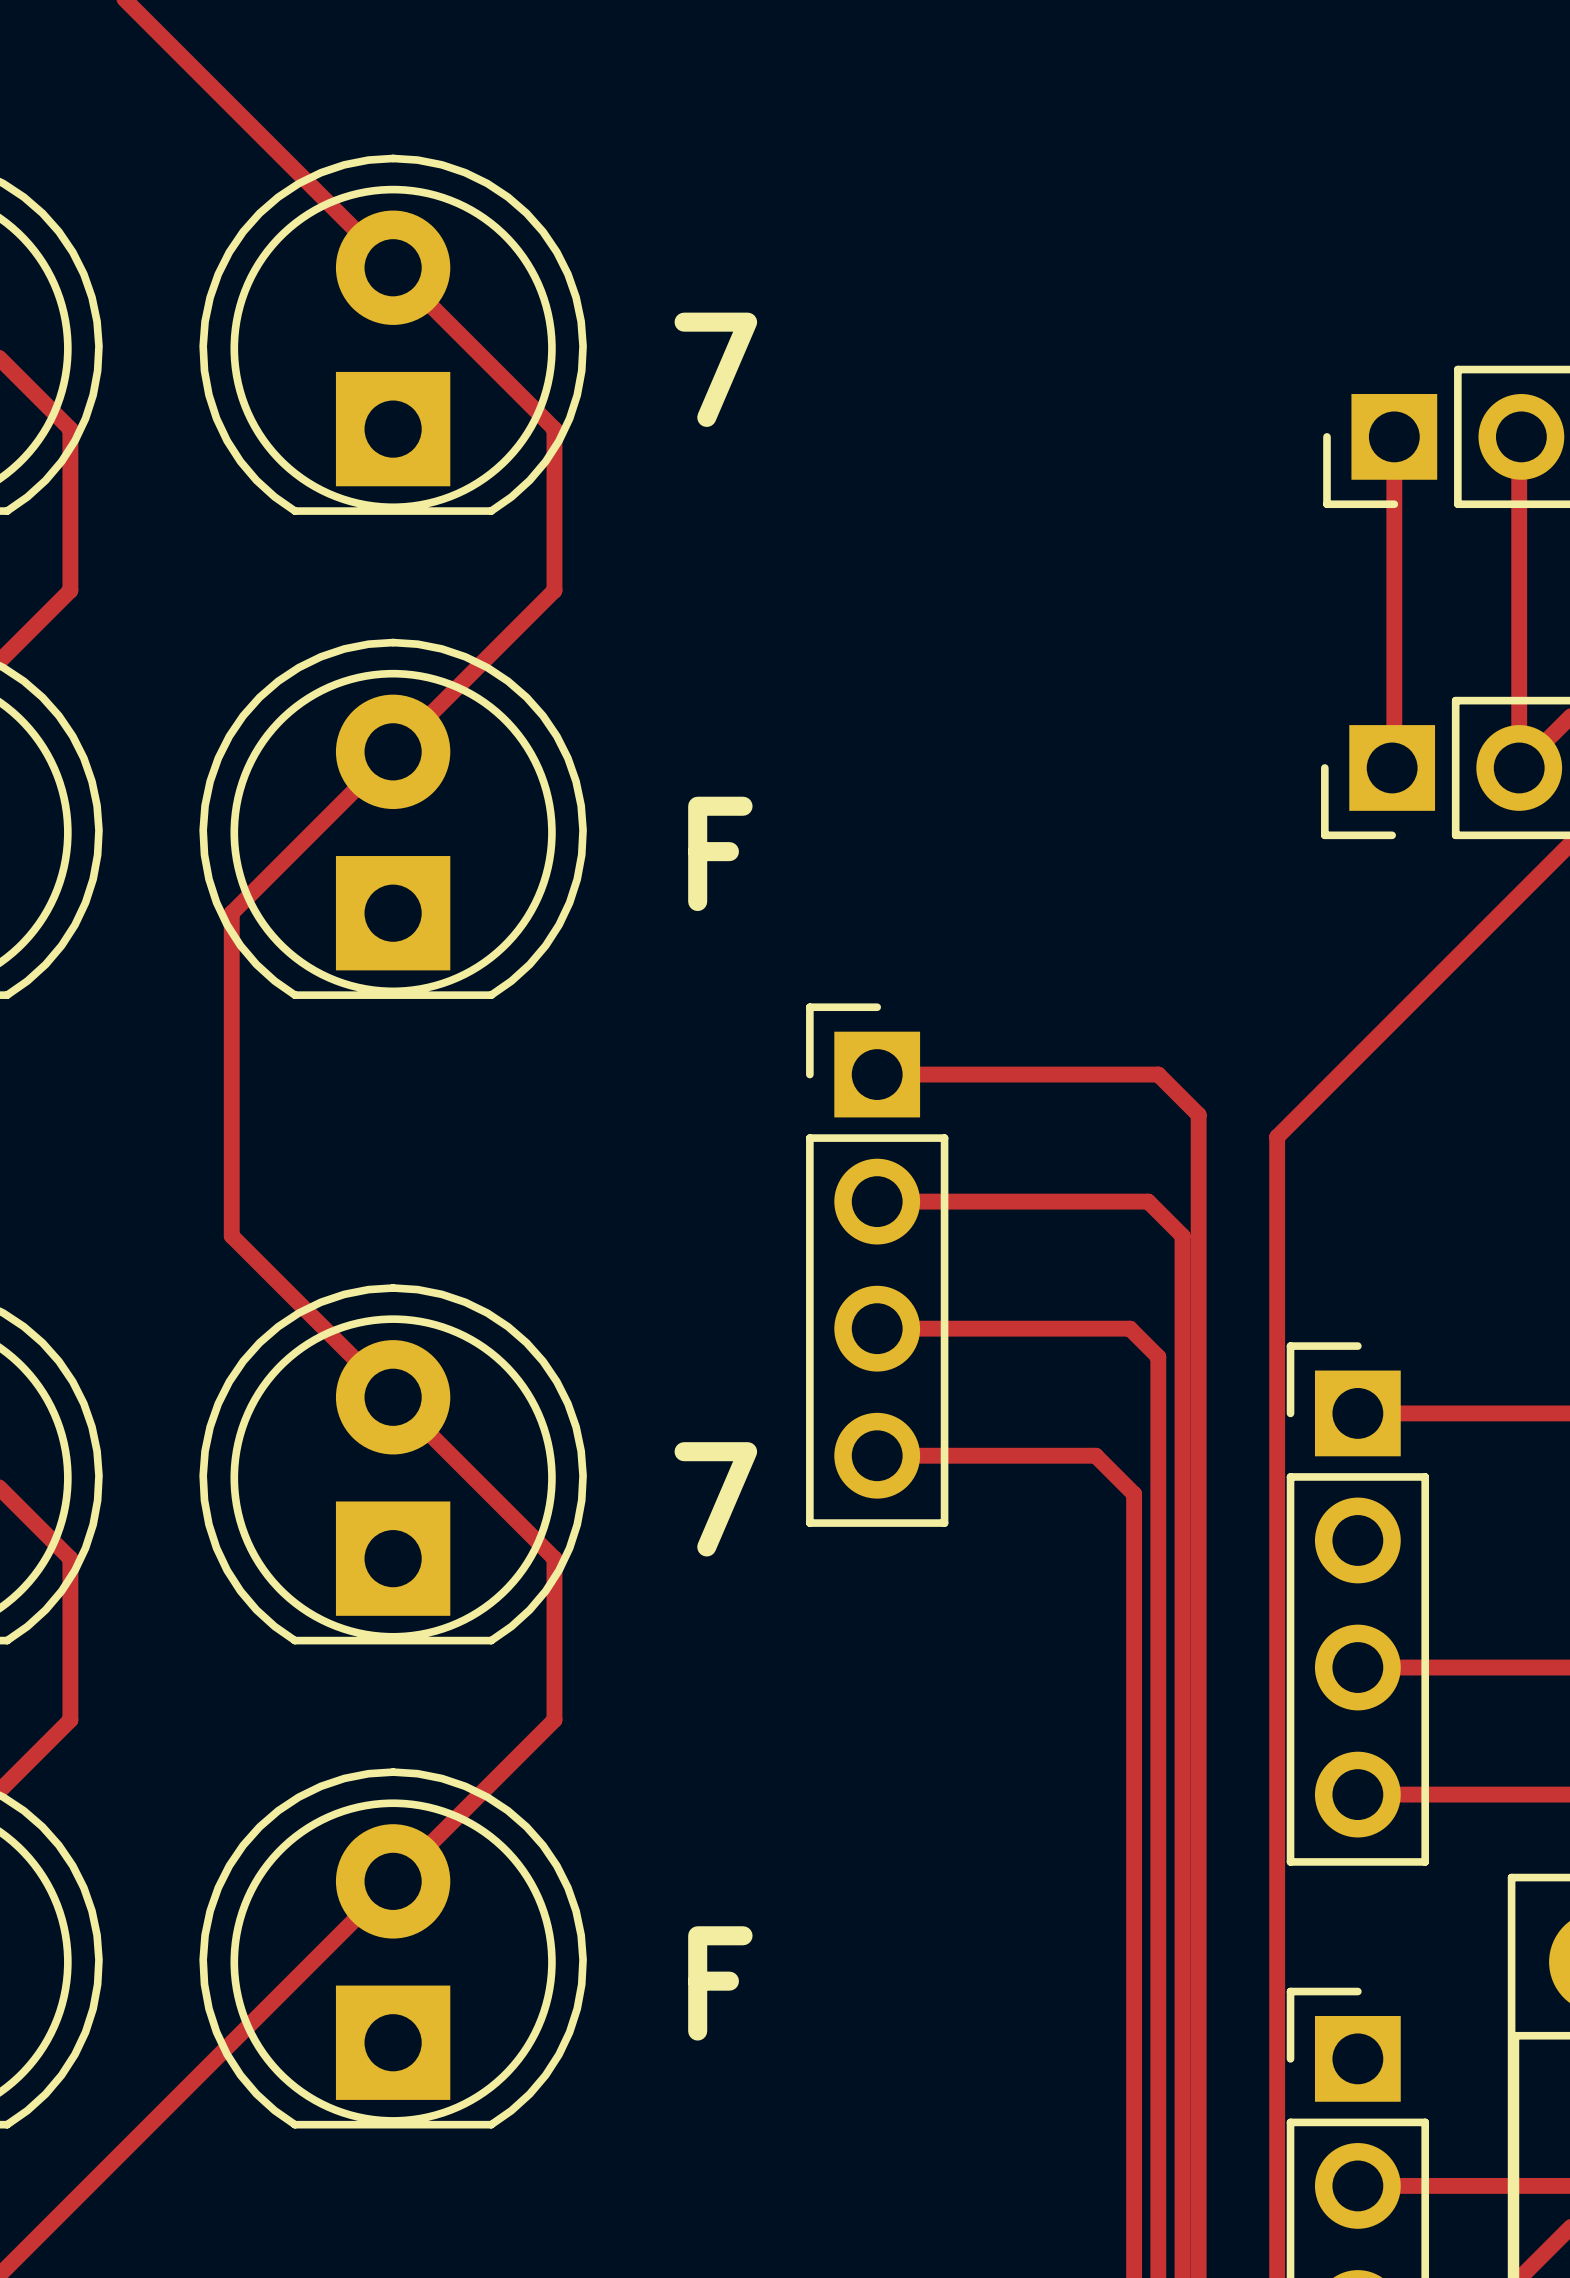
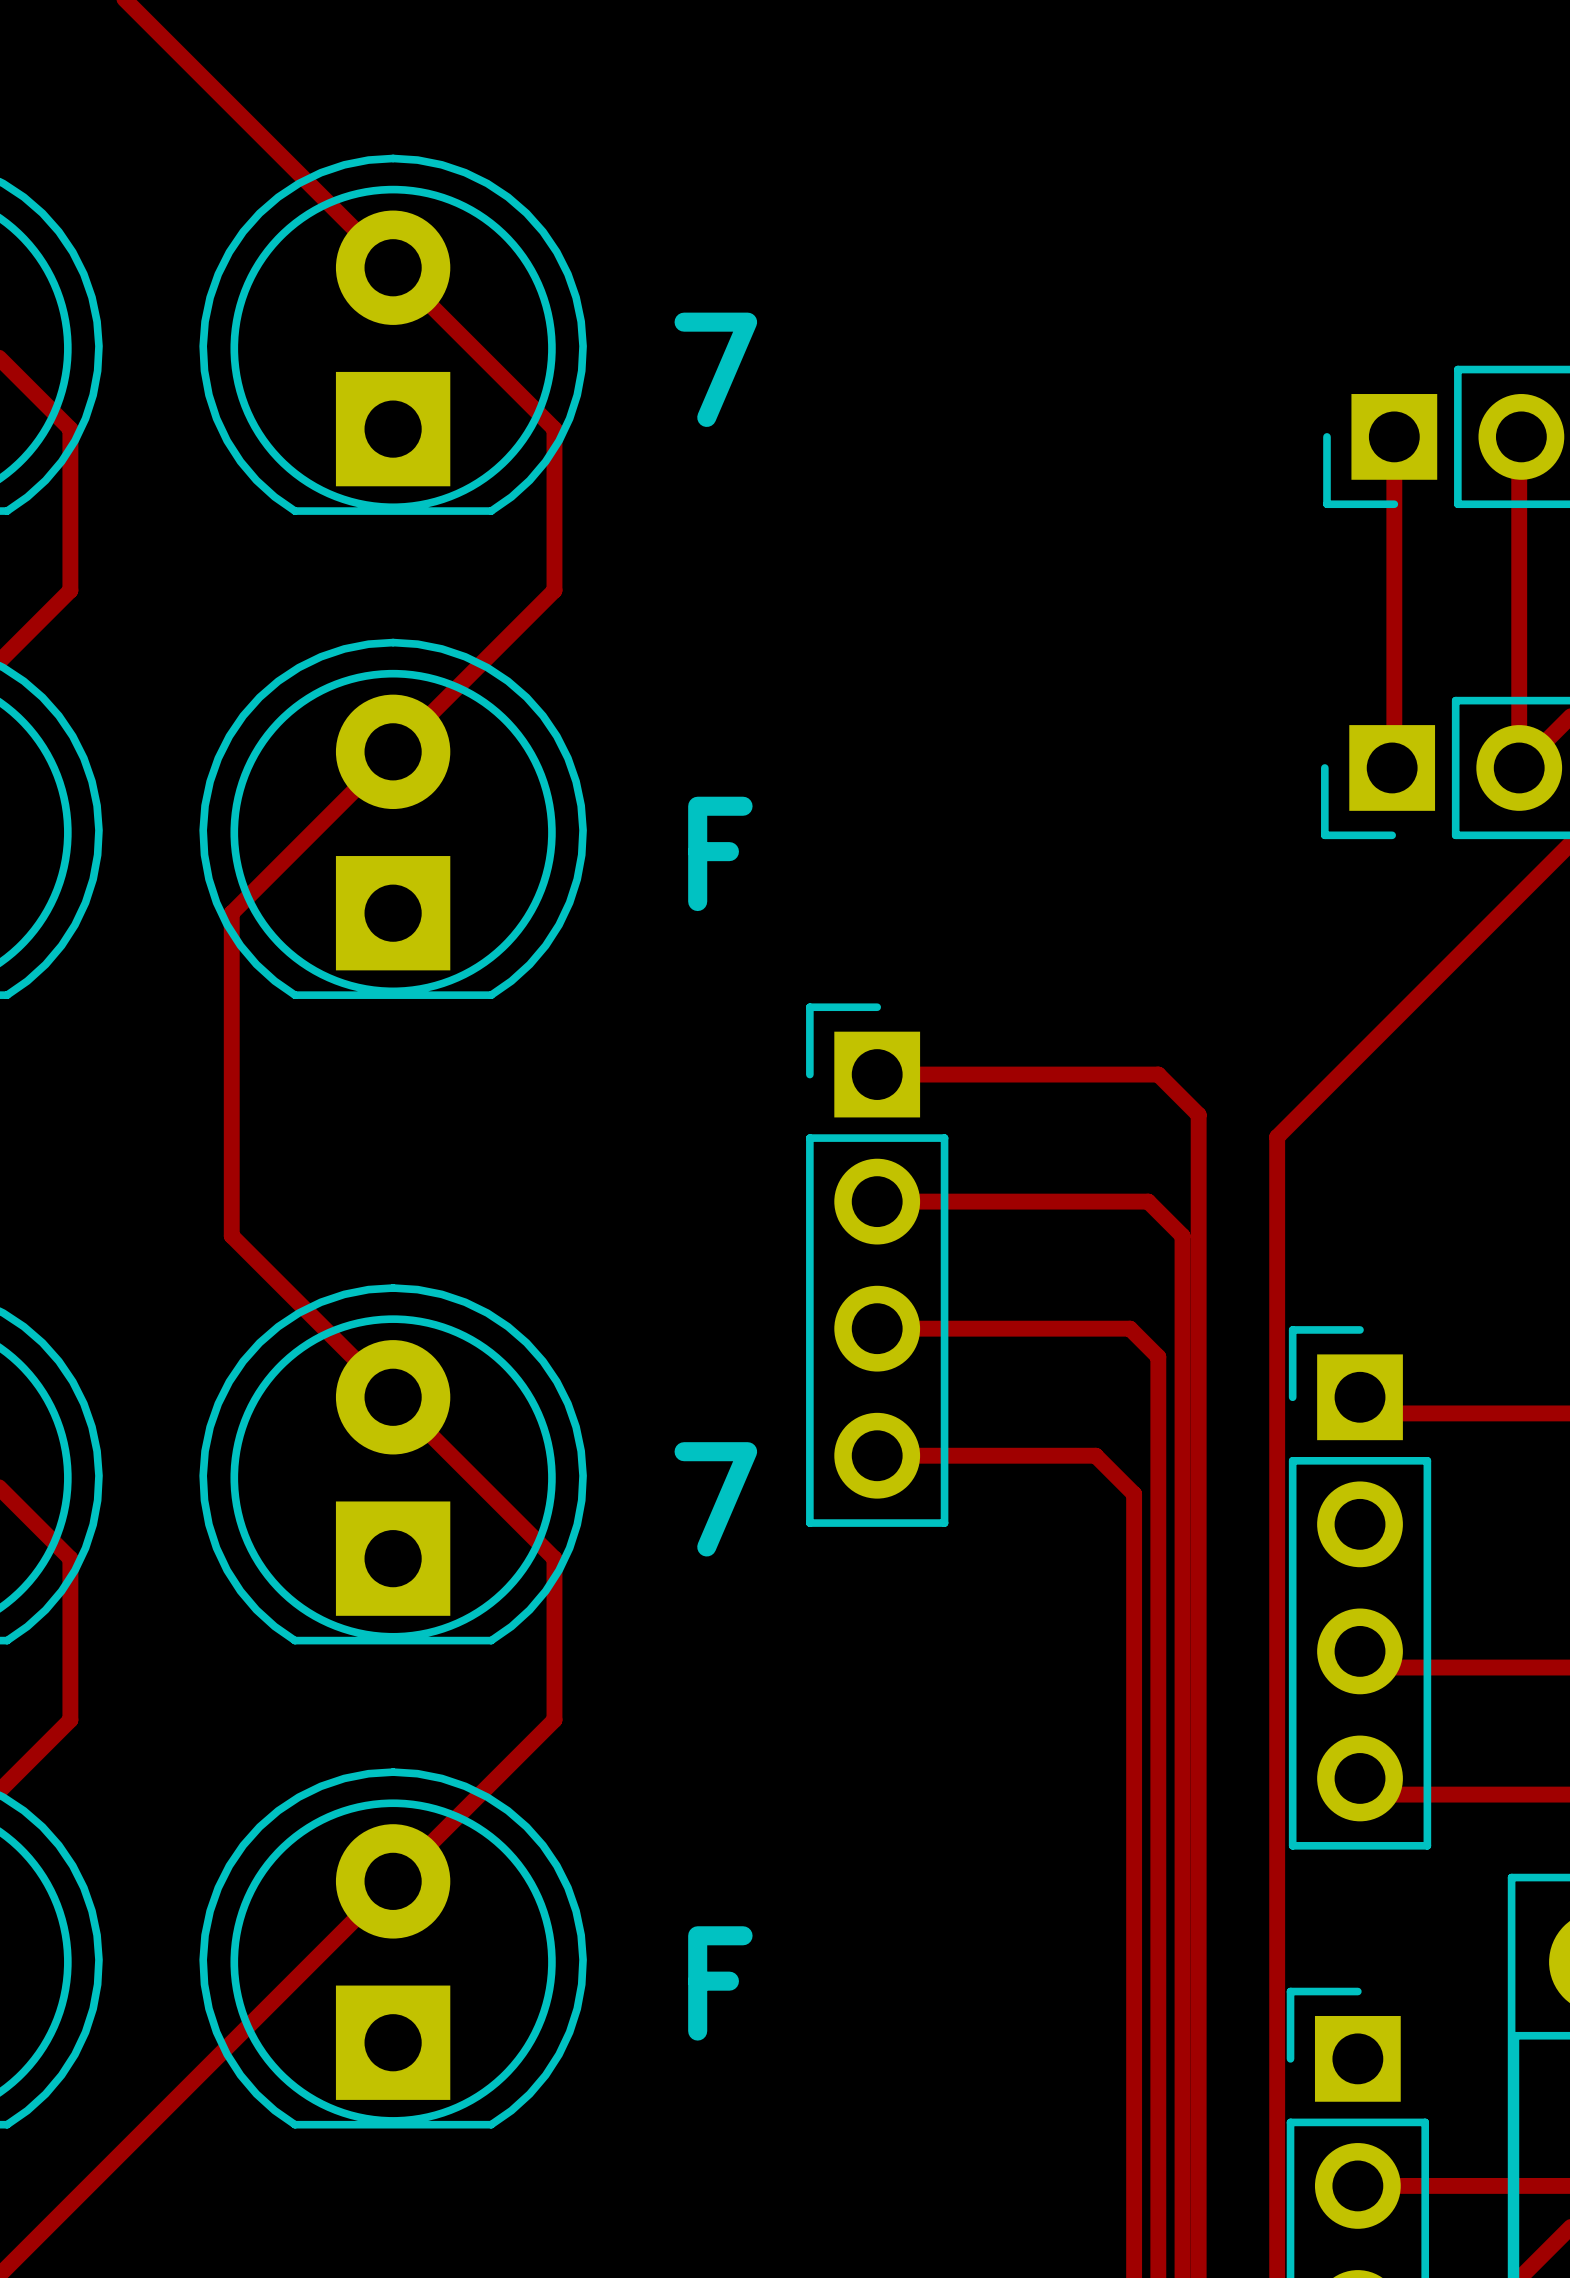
part position: (1357, 1604) -> (1360, 1587)

